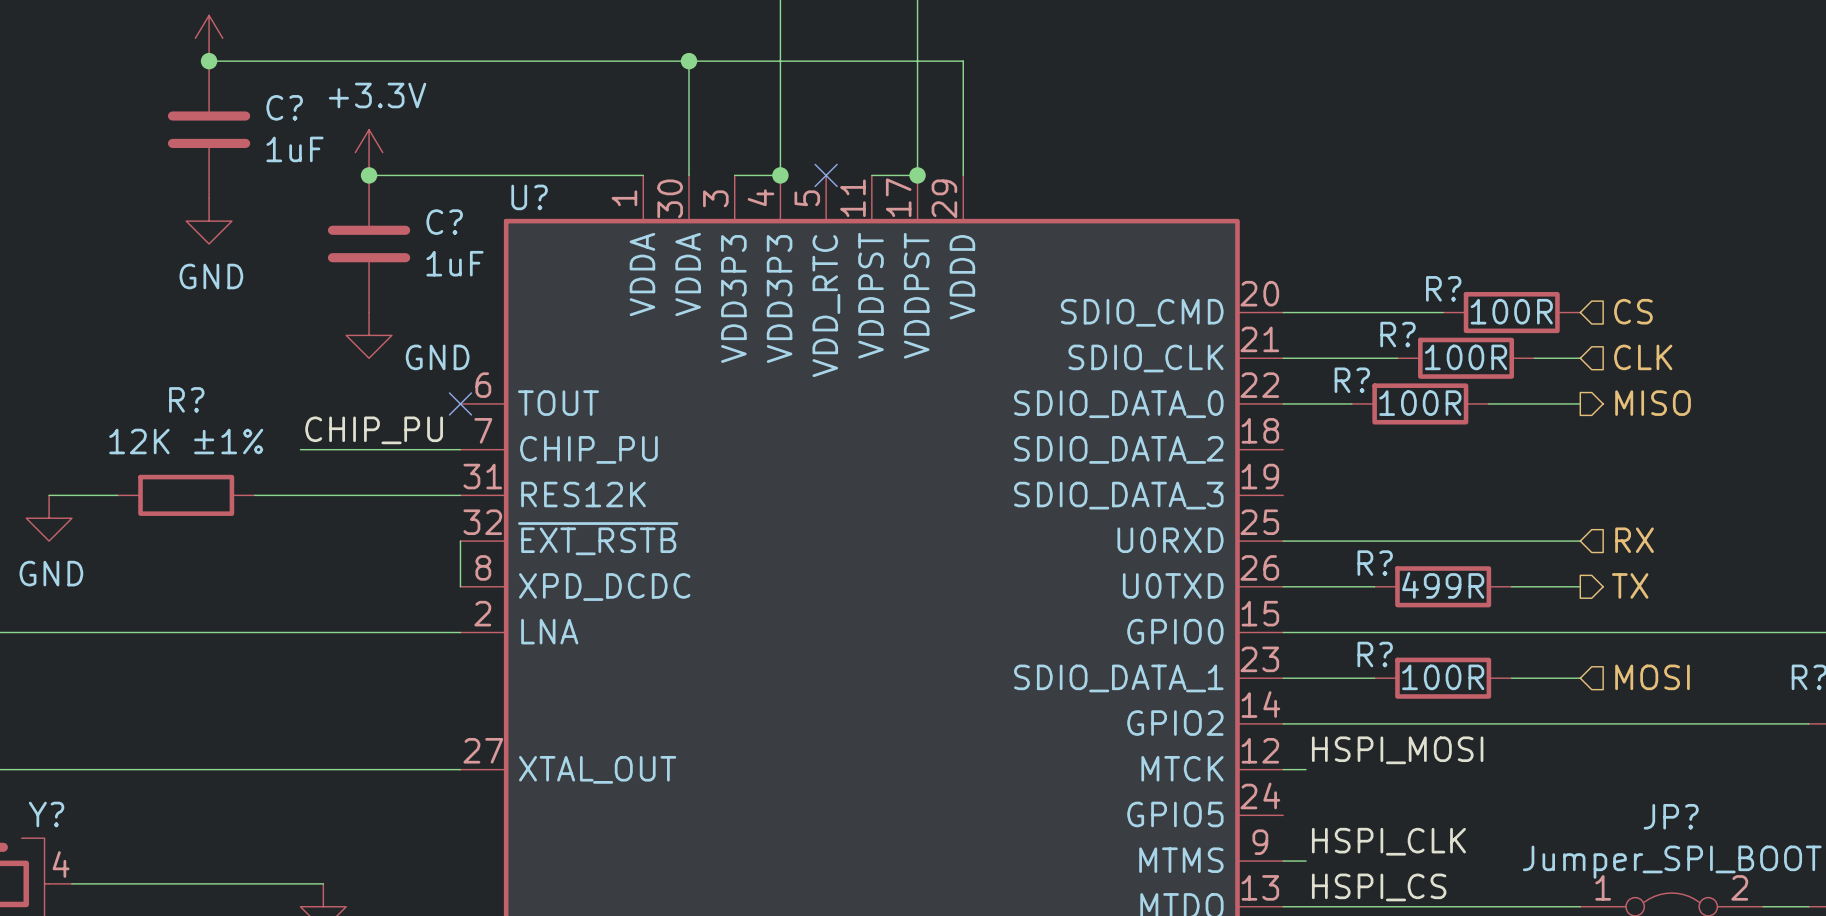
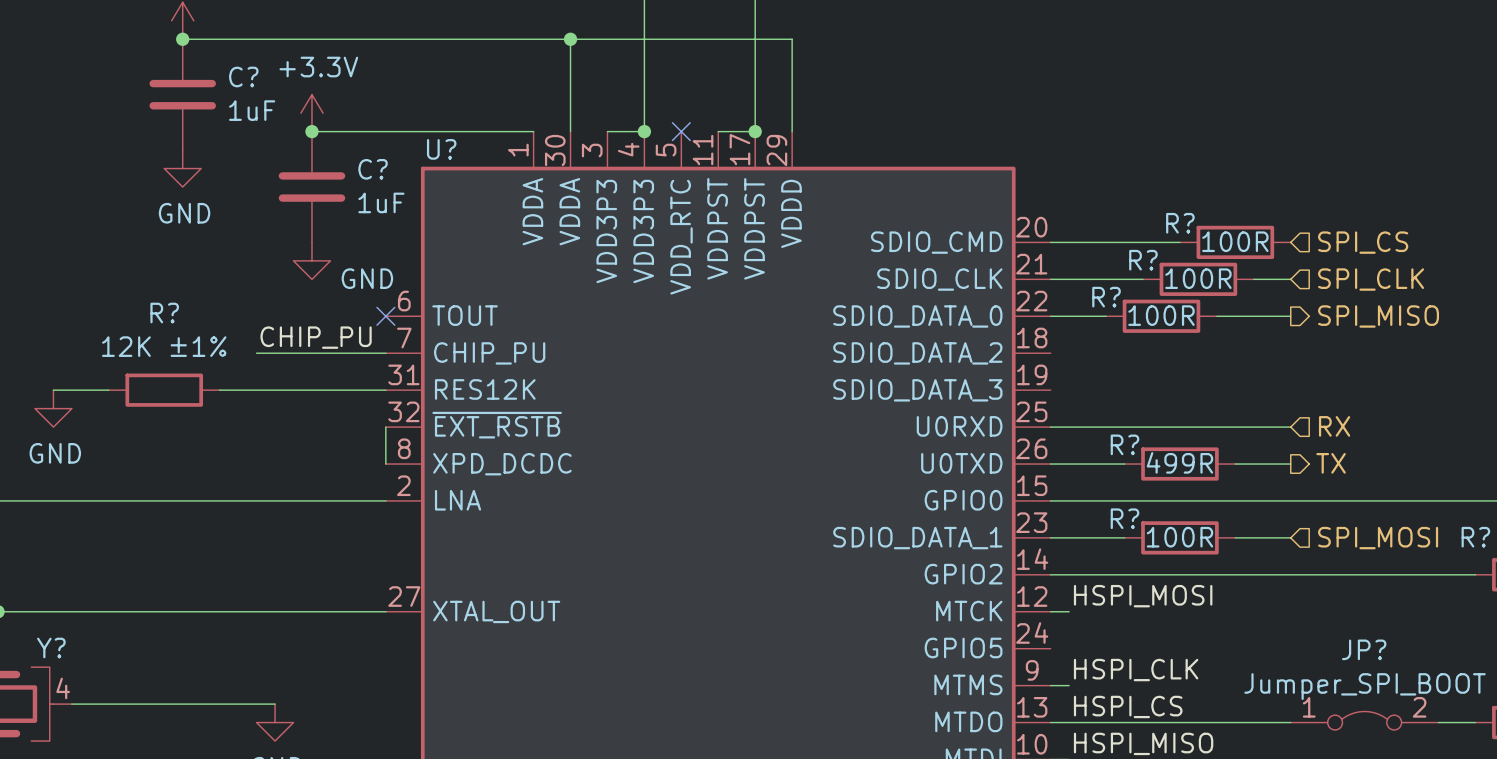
hierarchical label: CS (1633, 311) -> SPI_CS (1363, 242)
hierarchical label: CLK (1643, 357) -> SPI_CLK (1371, 279)
hierarchical label: MISO (1653, 403) -> SPI_MISO (1378, 316)
hierarchical label: MOSI (1652, 677) -> SPI_MOSI (1378, 538)

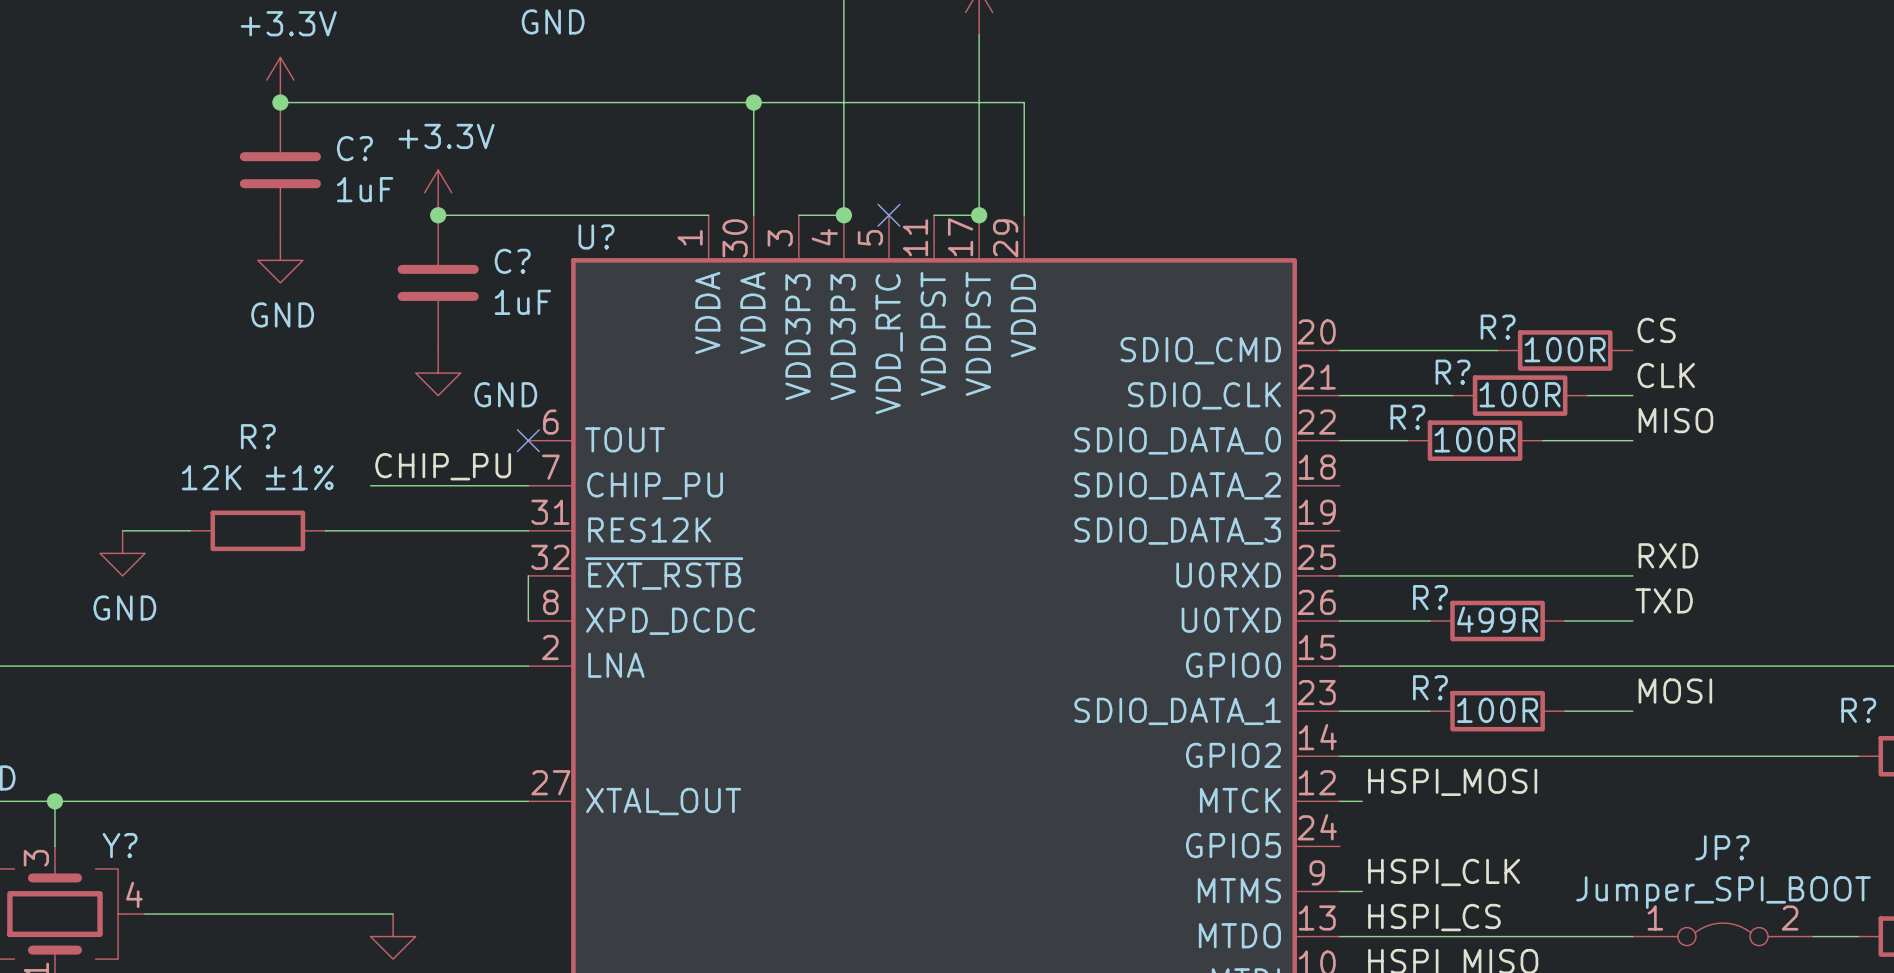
label: none -> CS (1656, 330)
hierarchical label: SPI_CS (1363, 242) -> none
label: none -> CLK (1666, 375)
hierarchical label: SPI_CLK (1371, 279) -> none
label: none -> MISO (1675, 420)
hierarchical label: SPI_MISO (1378, 316) -> none
label: none -> RXD (1668, 555)
hierarchical label: RX (1334, 426) -> none
label: none -> TXD (1664, 600)
hierarchical label: TX (1331, 463) -> none
label: none -> MOSI (1675, 691)
hierarchical label: SPI_MOSI (1378, 538) -> none

